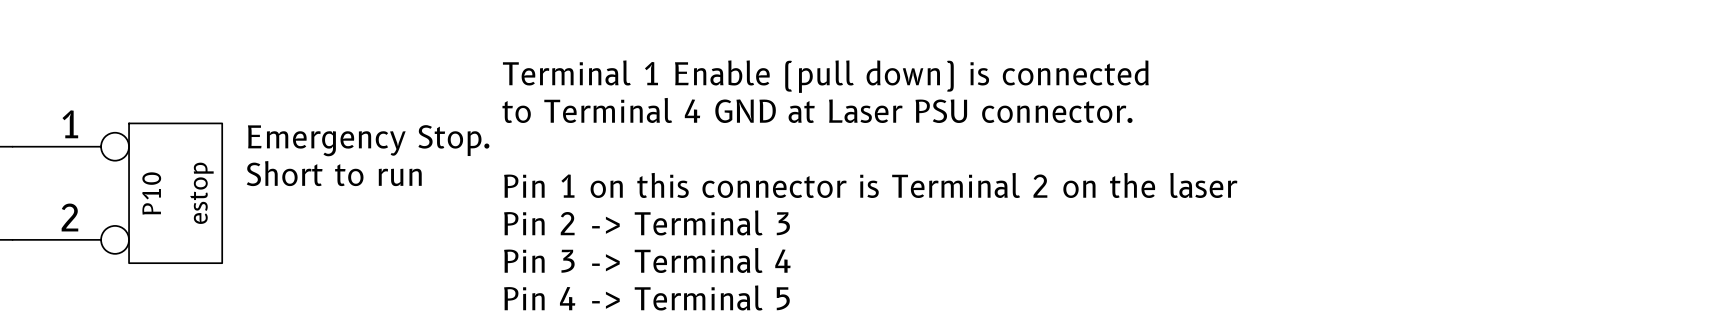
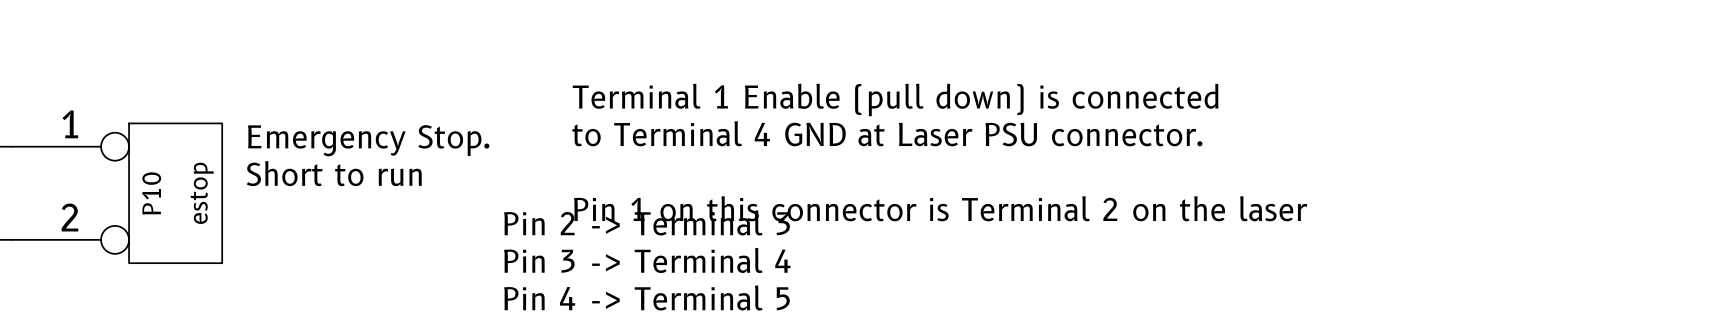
text position: Terminal 1 Enable (pull down) is connected (825, 76) -> Terminal 1 Enable (pull down) is connected (895, 99)
text position: to Terminal 4 GND at Laser PSU connector. (817, 110) -> to Terminal 4 GND at Laser PSU connector. (887, 133)
text position: Pin 1 on this connector is Terminal 2 on the laser (870, 185) -> Pin 1 on this connector is Terminal 2 on the laser (940, 208)

